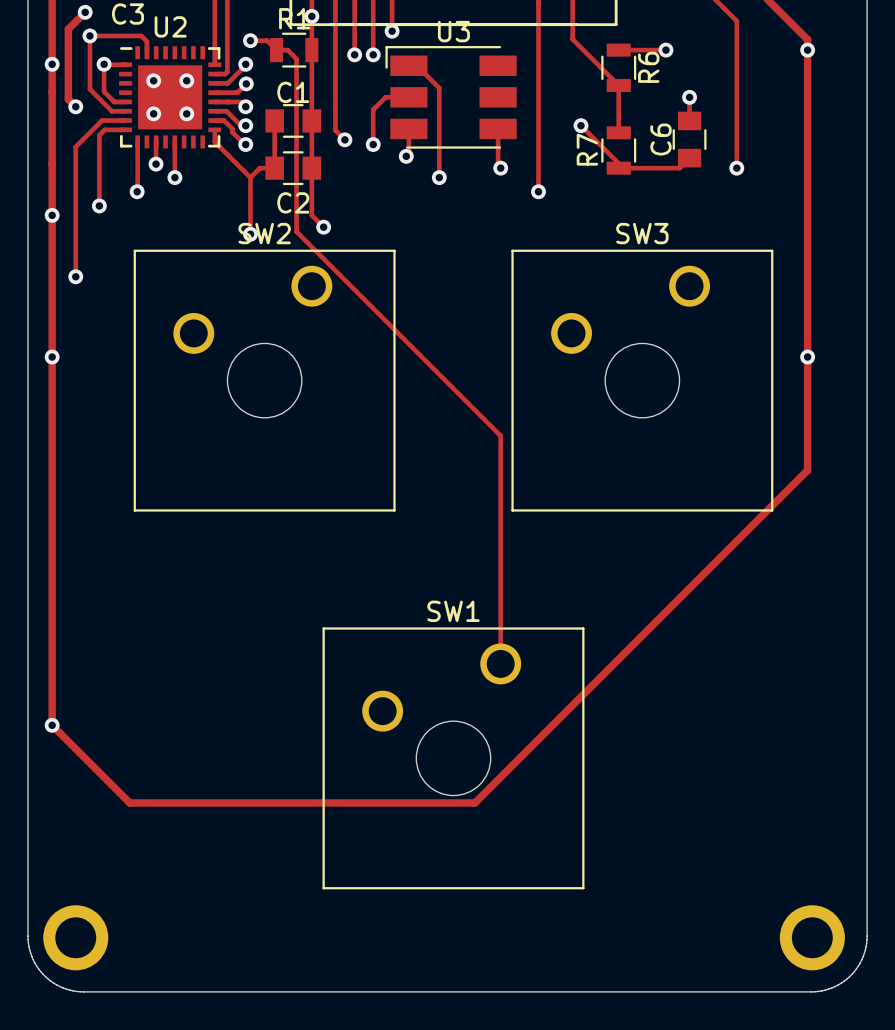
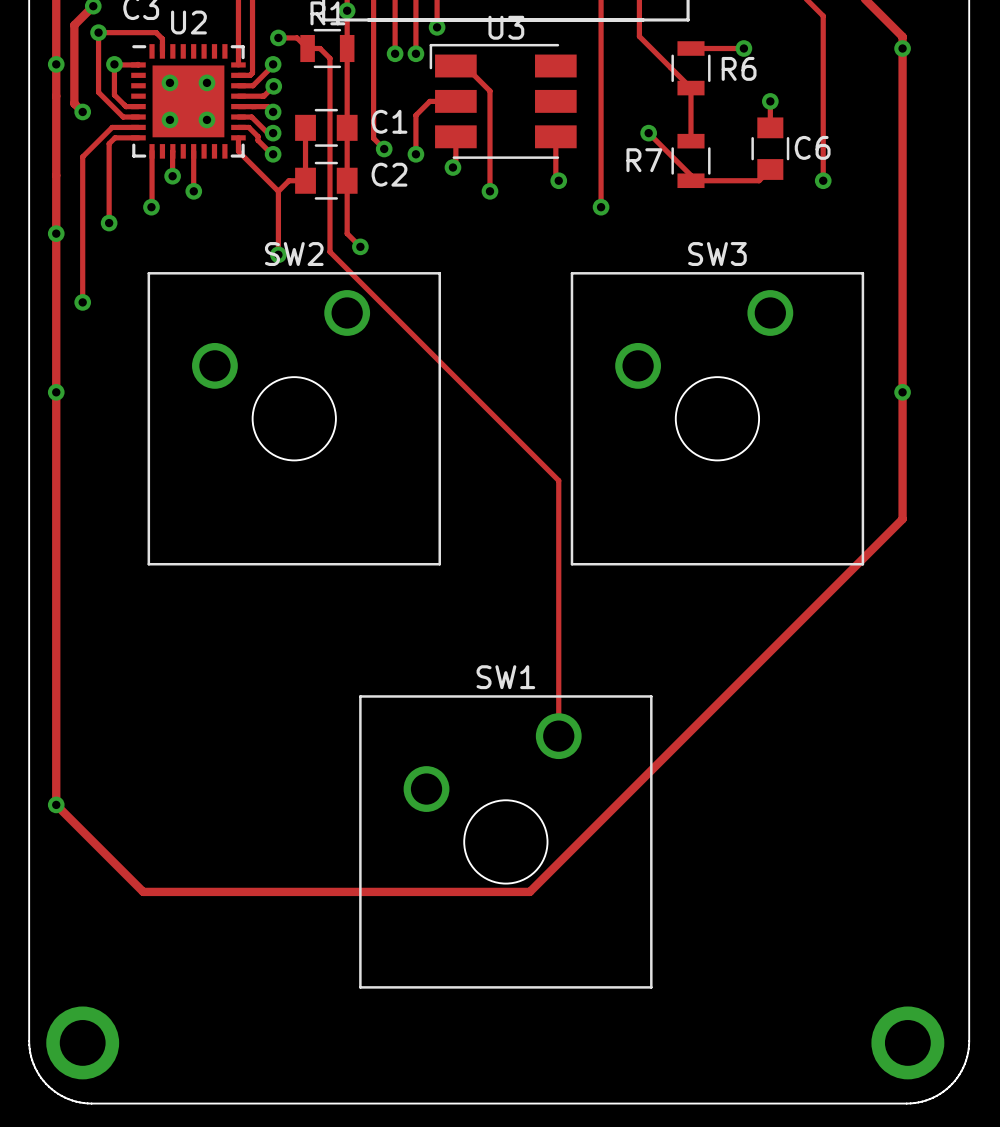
R6 name rotation: 0° (648, 67) -> 90° clockwise (739, 68)
C1 name position: C1 (293, 92) -> C1 (389, 121)
C6 name rotation: 0° (661, 139) -> 90° clockwise (812, 147)
C6 name position: C6 (661, 139) -> C6 (812, 147)
R7 name rotation: 0° (587, 149) -> 90° clockwise (644, 160)
C2 name position: C2 (293, 202) -> C2 (389, 174)

